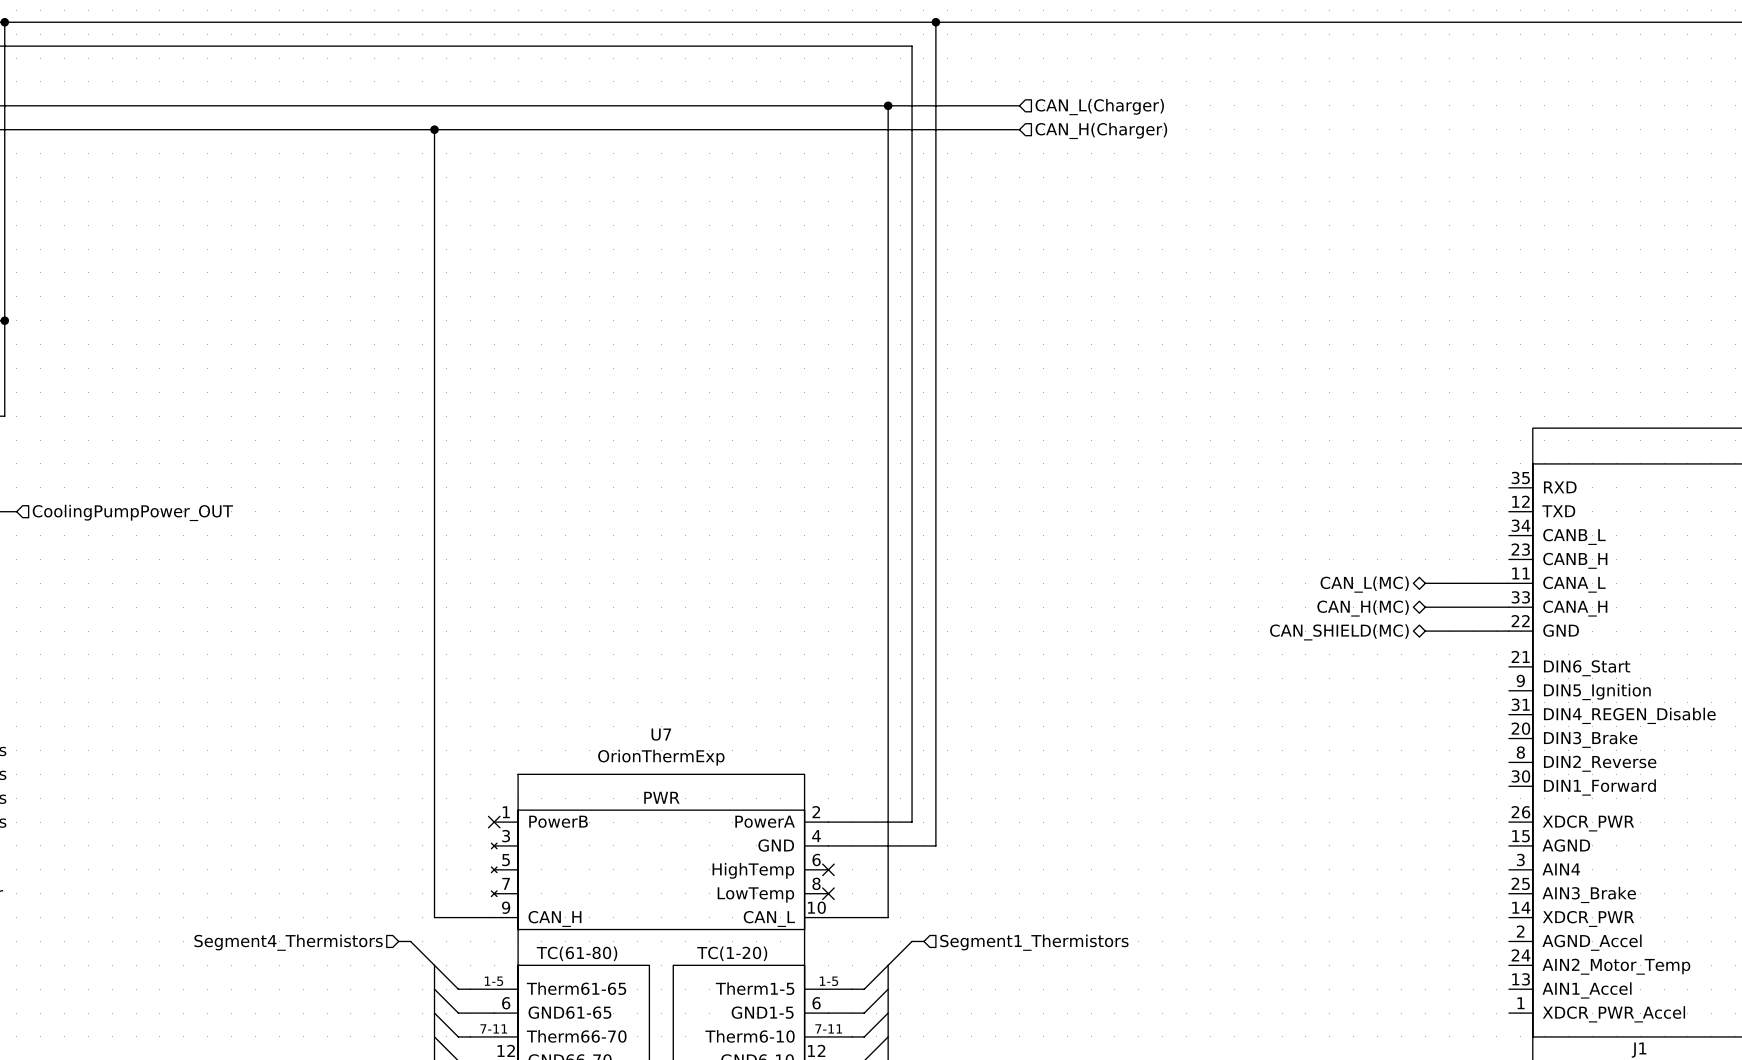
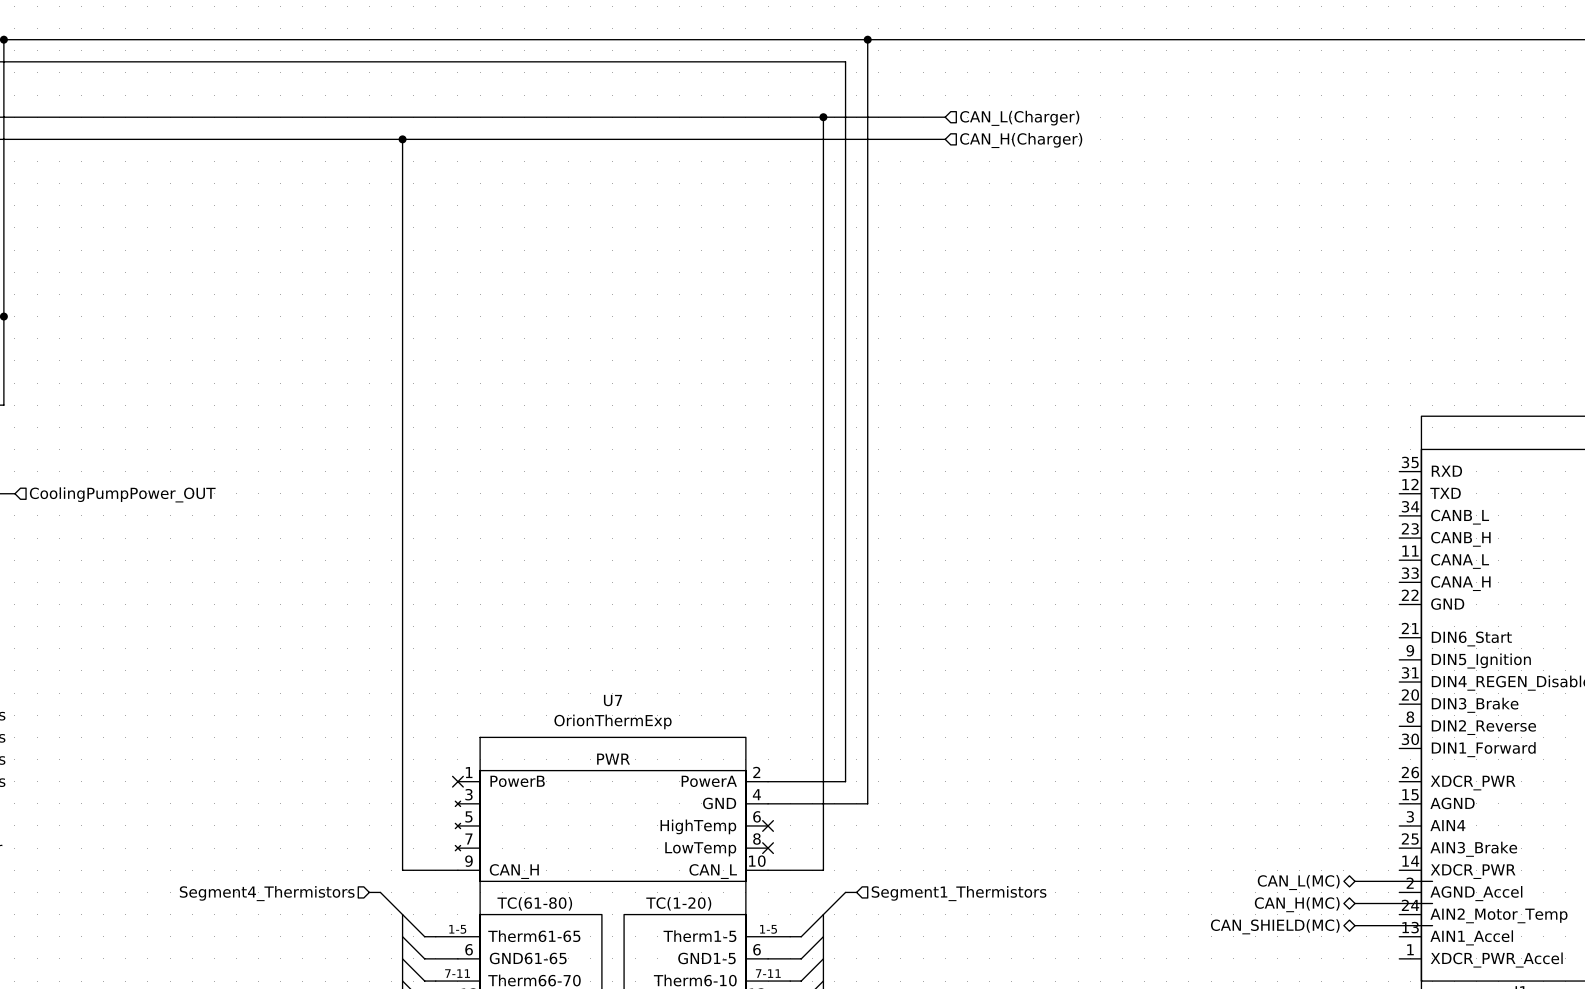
wire: (1425, 583) (1508, 583) -> none
hierarchical label: CAN_L(MC) (1364, 584) -> none
wire: (1425, 607) (1508, 607) -> none
hierarchical label: CAN_H(MC) (1363, 608) -> none
wire: (1425, 631) (1508, 631) -> none
hierarchical label: CAN_SHIELD(MC) (1339, 632) -> none
wire: none -> (1354, 881) (1432, 881)
hierarchical label: none -> CAN_L(MC) (1298, 882)
wire: none -> (1354, 903) (1432, 903)
hierarchical label: none -> CAN_H(MC) (1297, 904)
wire: none -> (1354, 925) (1432, 925)
hierarchical label: none -> CAN_SHIELD(MC) (1275, 926)

